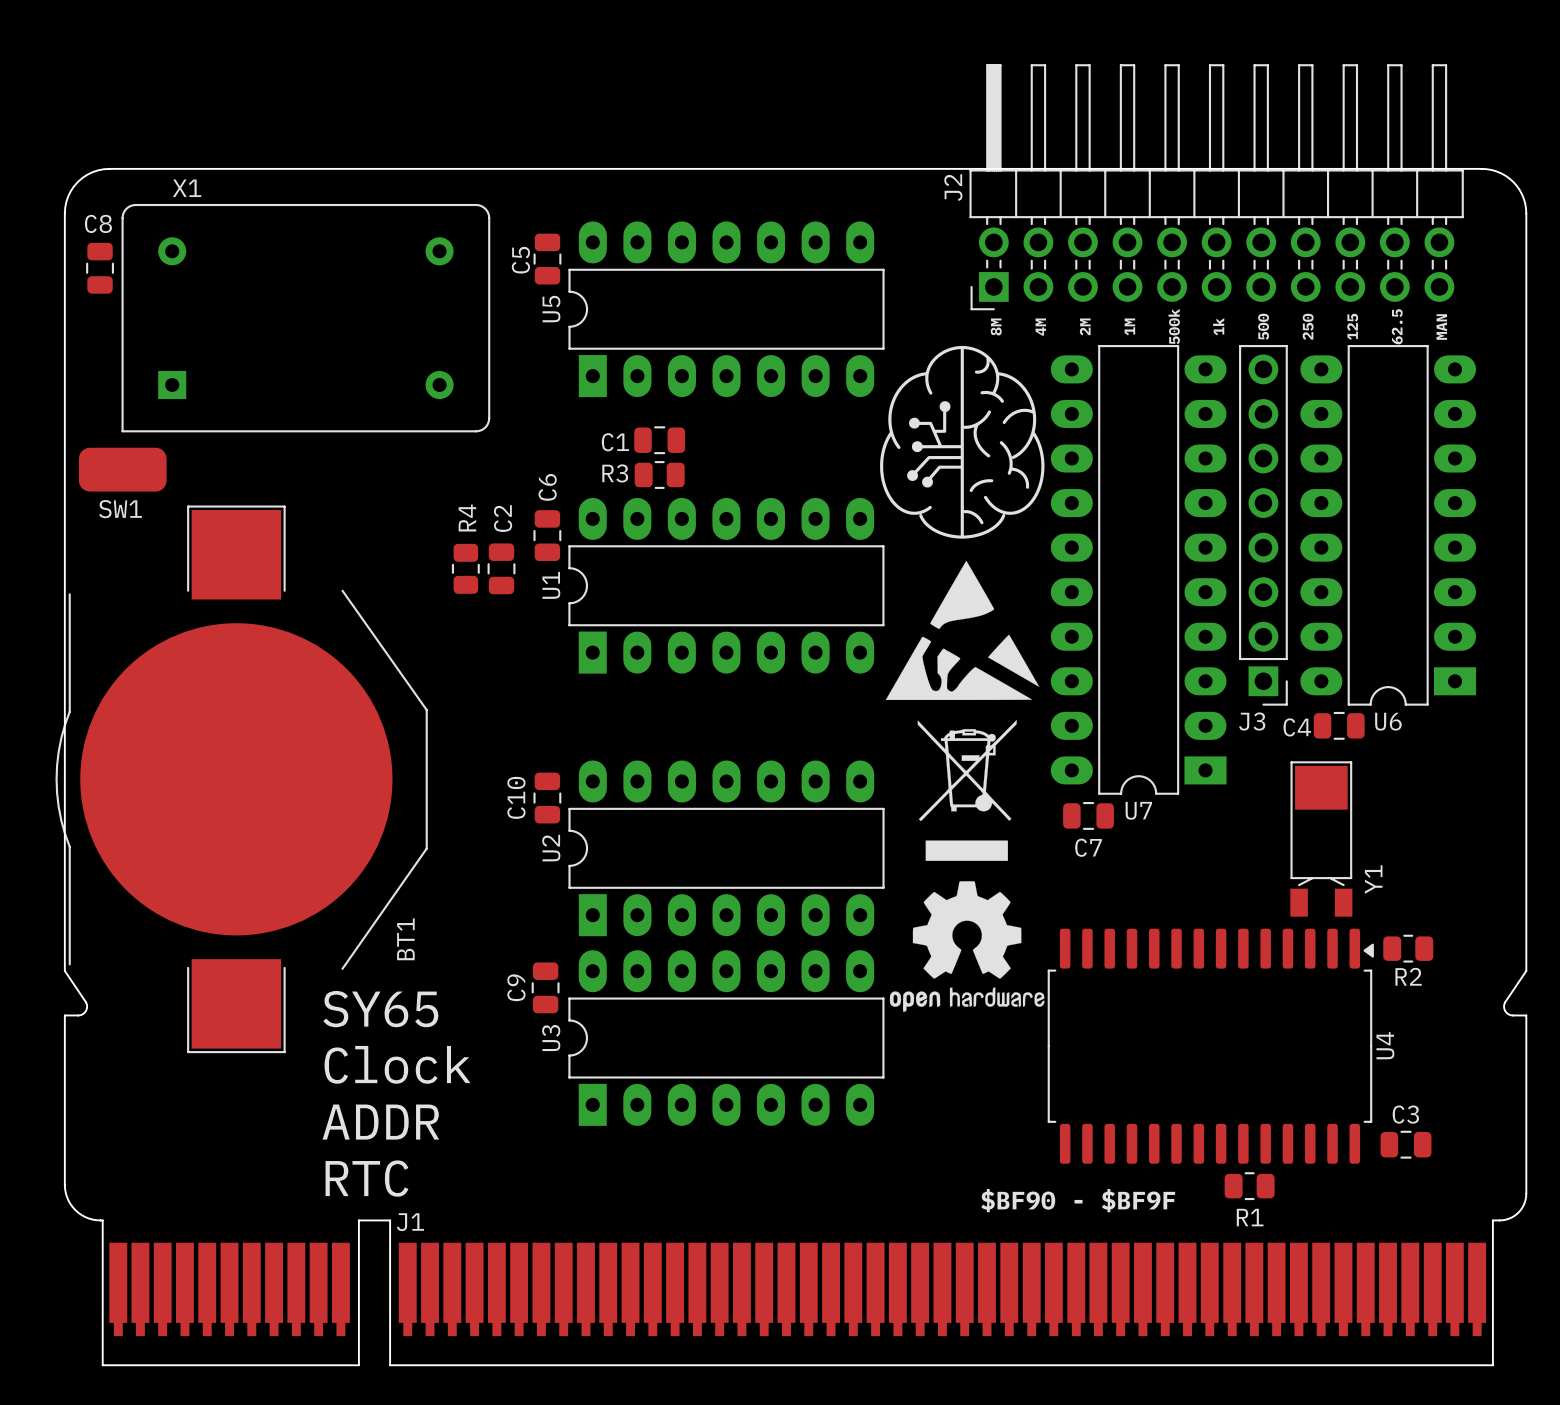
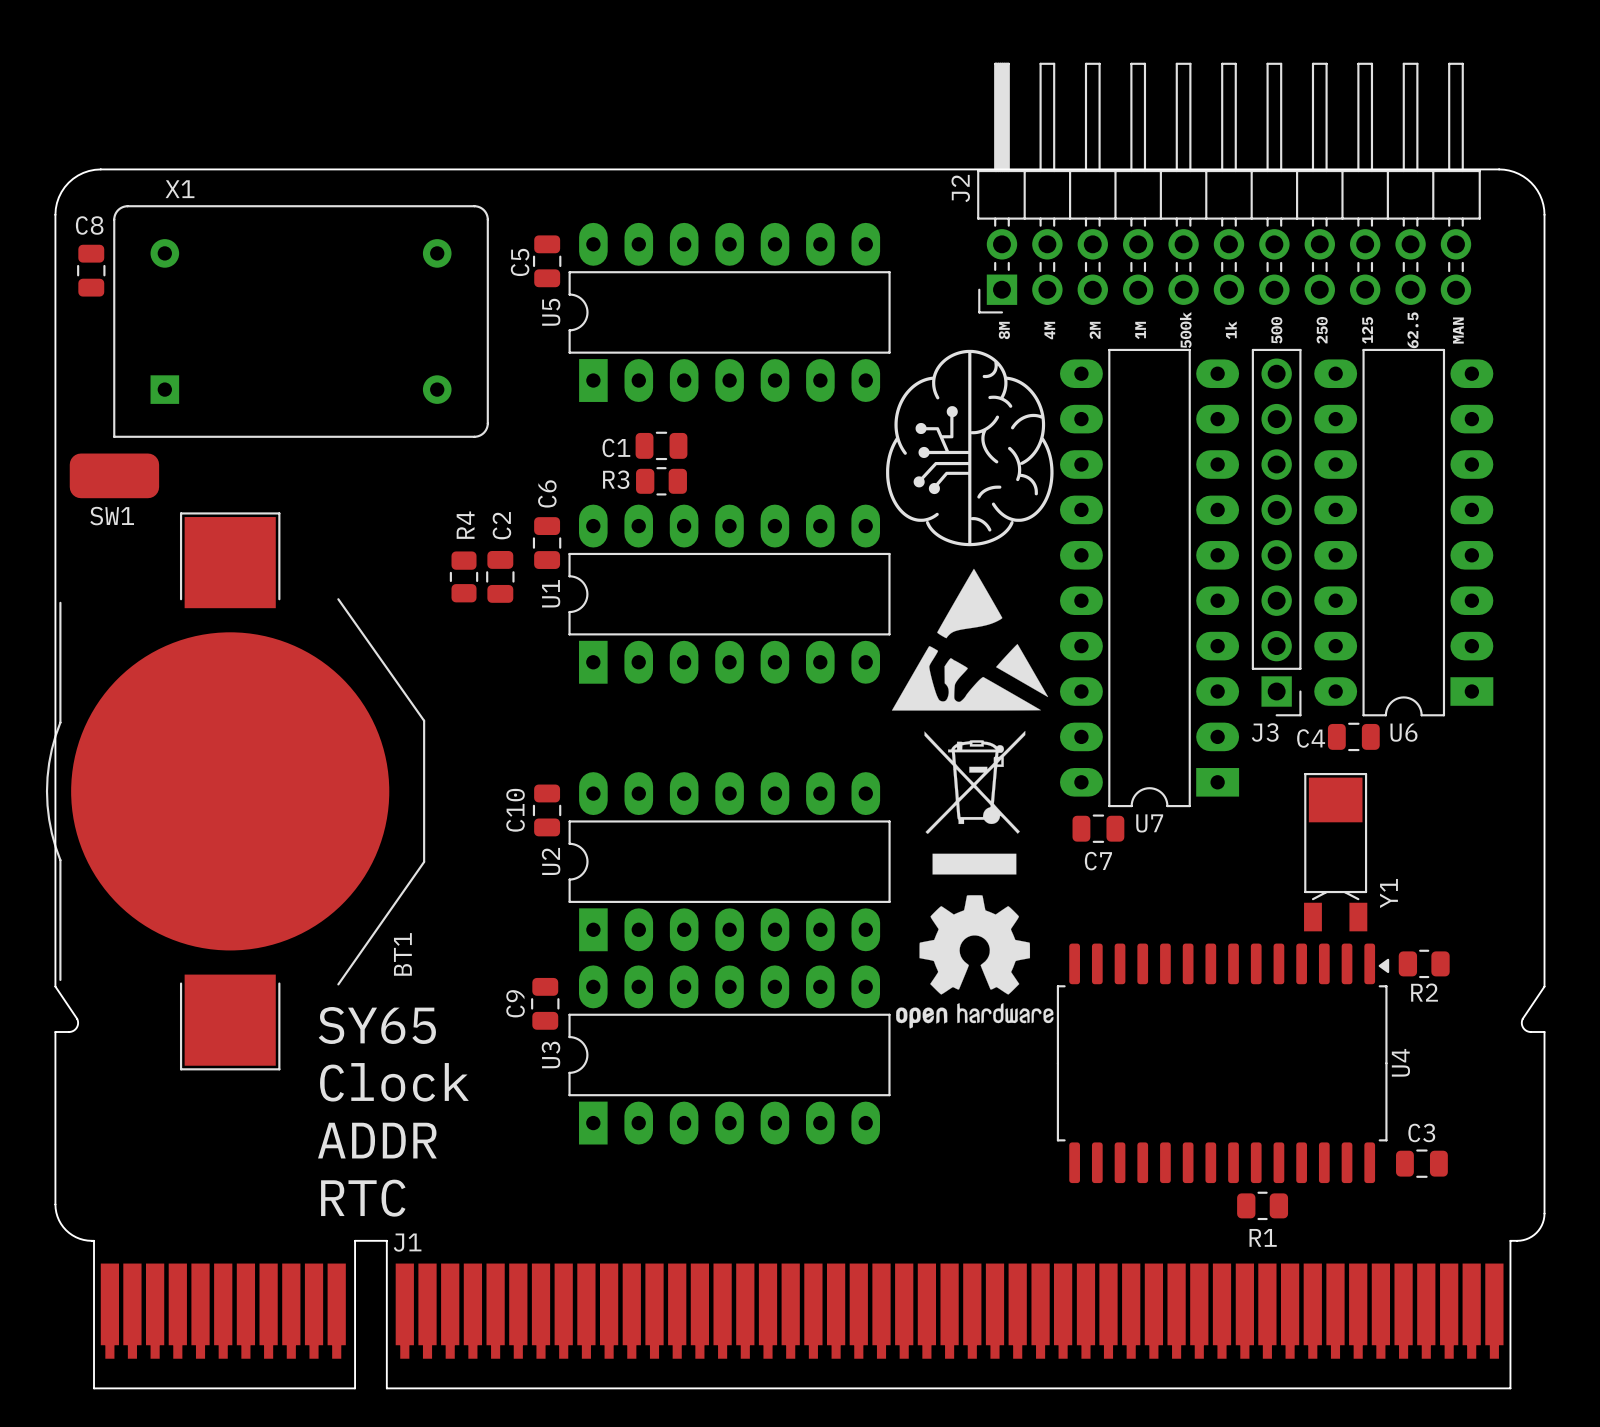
text: $BF90 - $BF9F (1078, 1200) -> none

